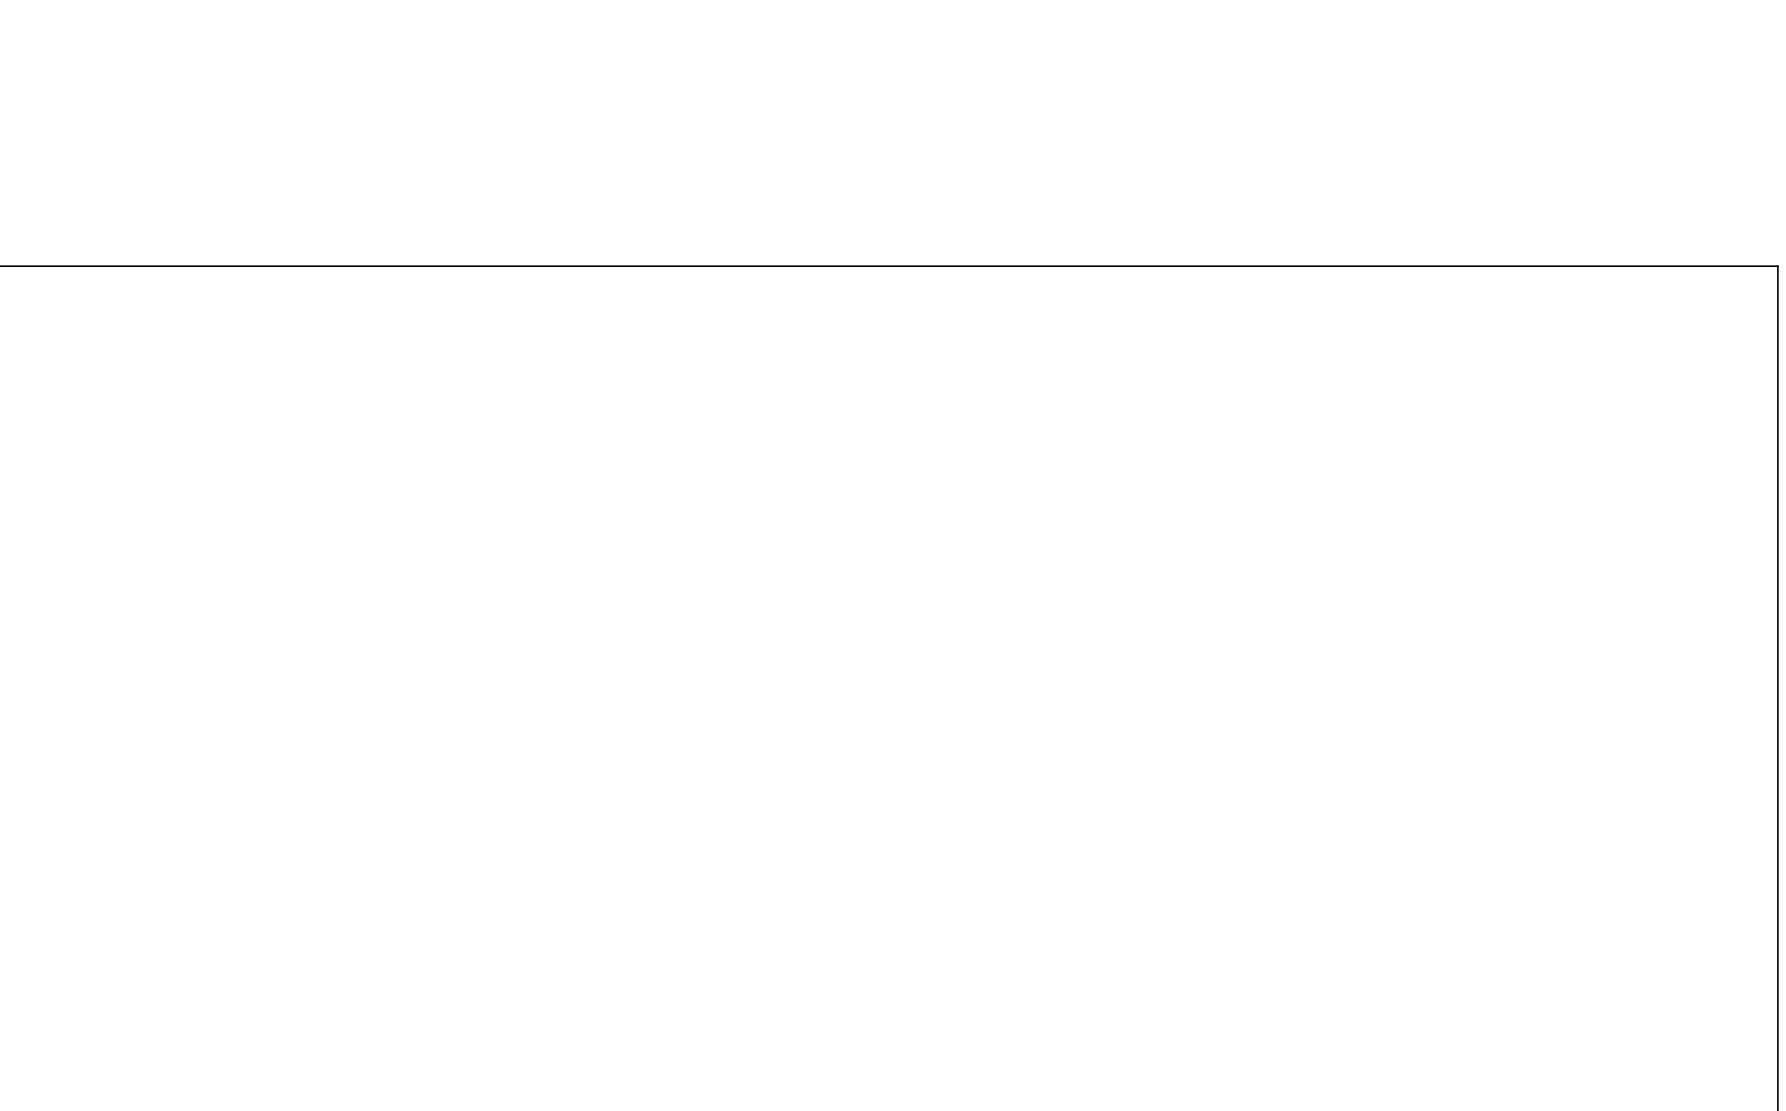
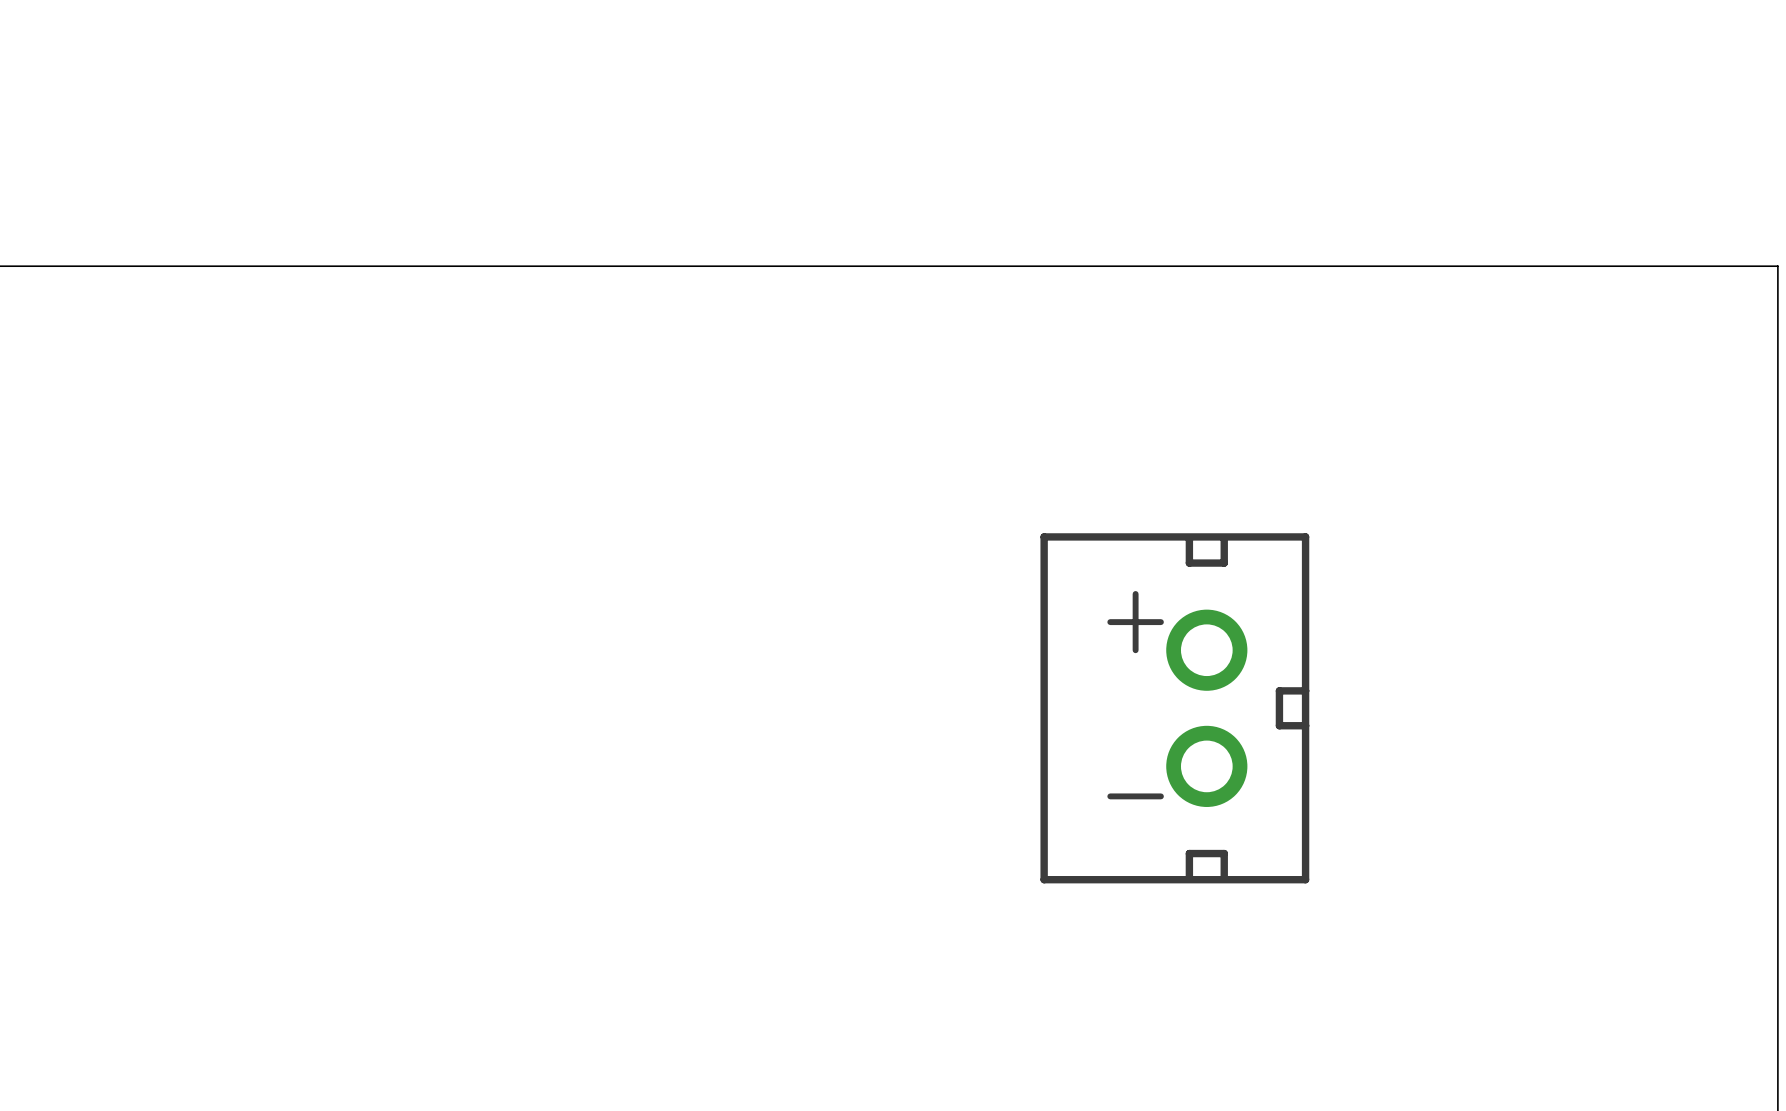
part: none -> (1174, 708)

